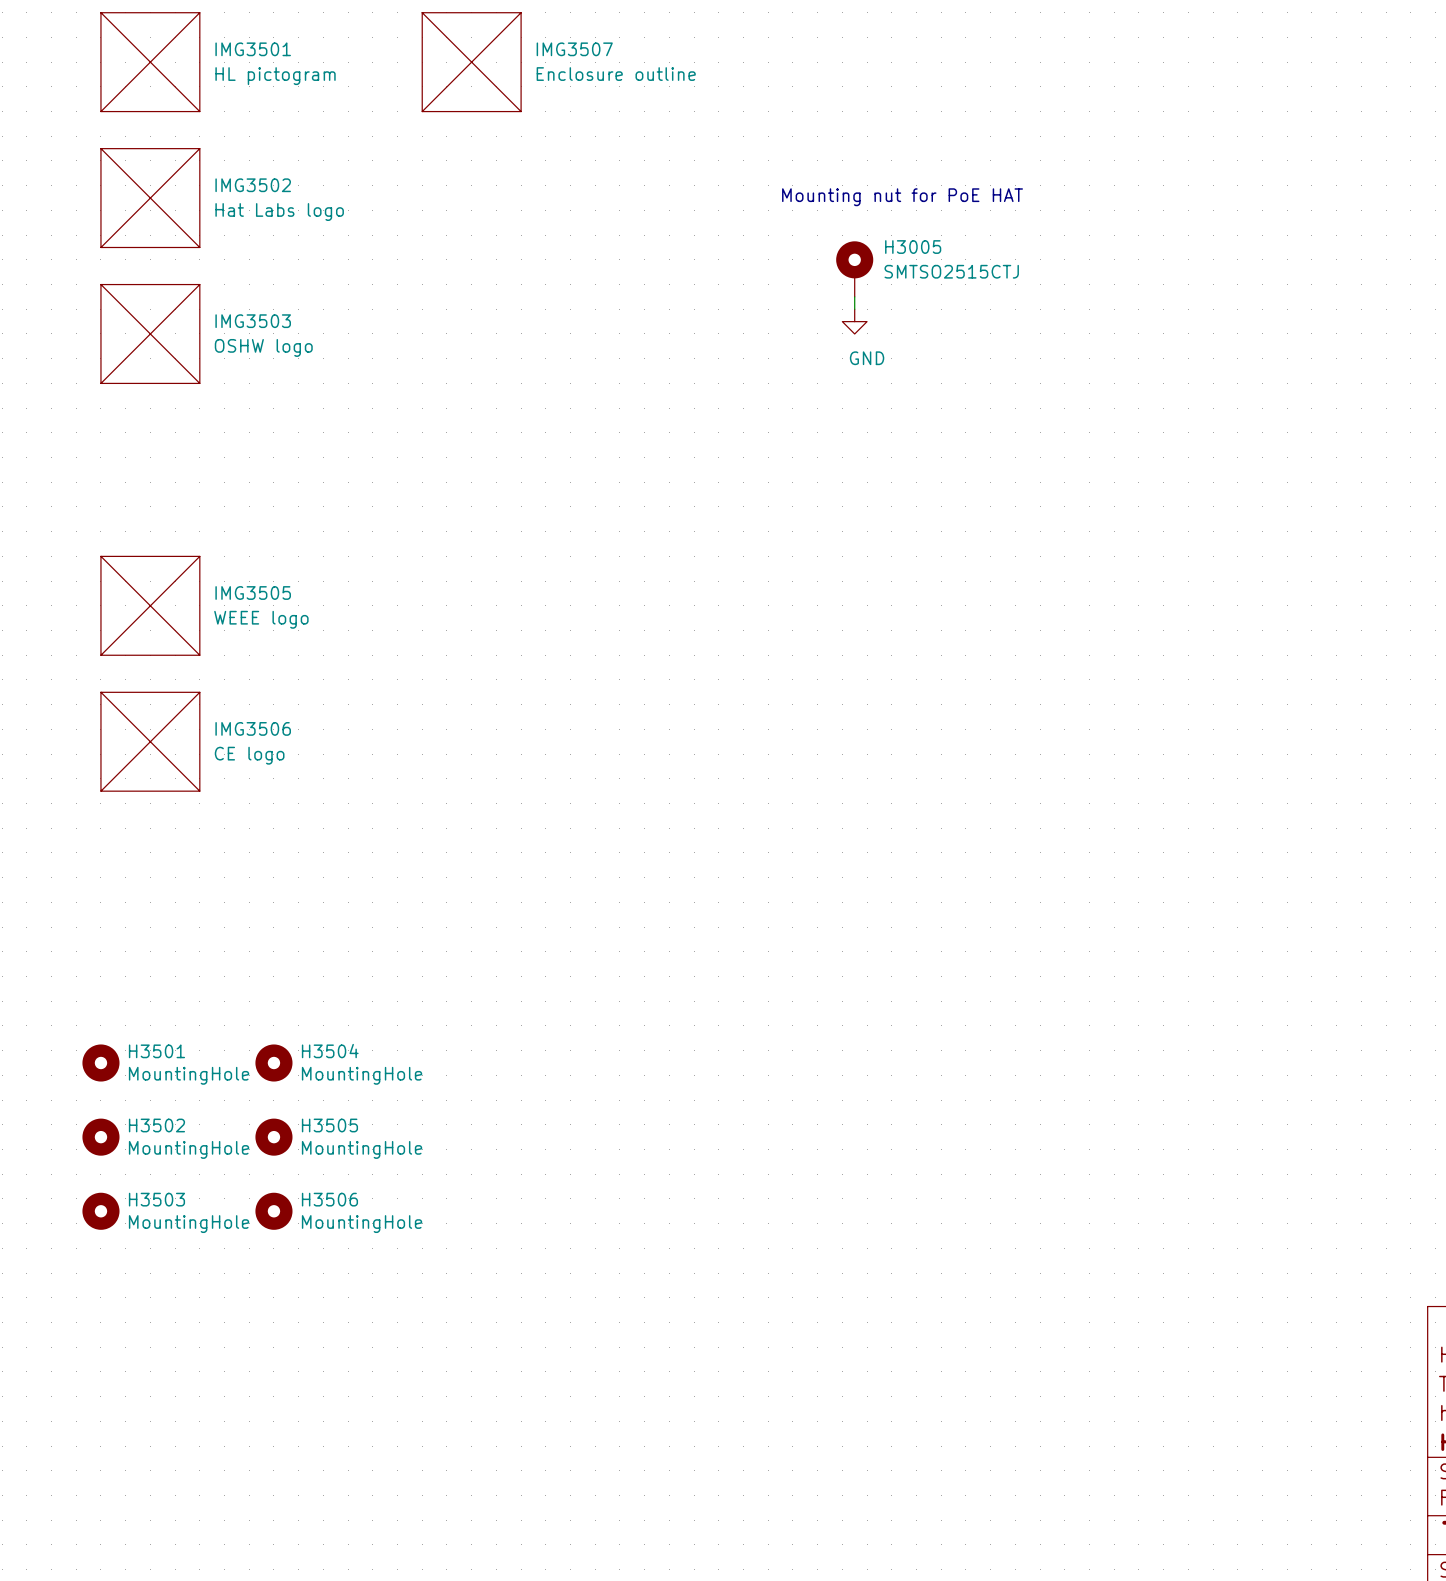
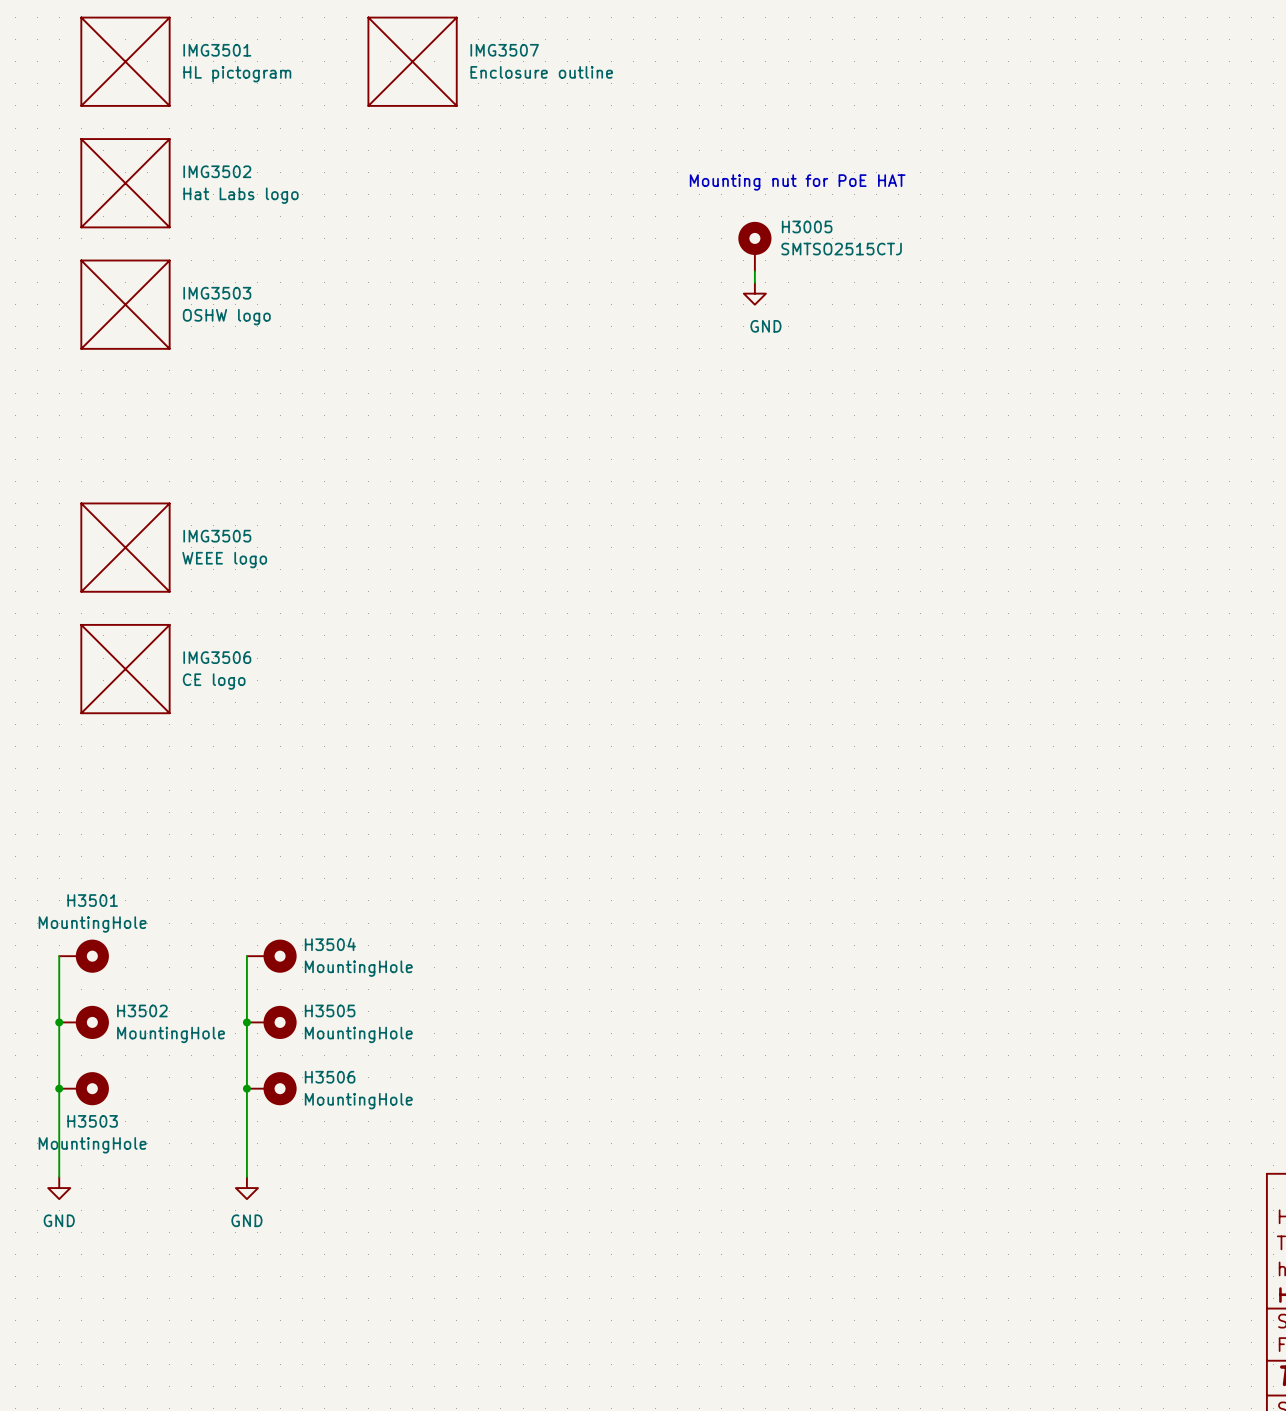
H3501 symbol: [82, 1044, 120, 1082] -> [59, 939, 109, 973]
H3504 symbol: [255, 1044, 293, 1082] -> [246, 939, 297, 973]
H3501 name position: H3501 (156, 1051) -> H3501 (92, 900)
wire: none -> (59, 956) (59, 1177)
wire: none -> (246, 956) (246, 1177)
H3501 value position: MountingHole (189, 1075) -> MountingHole (92, 924)
H3502 symbol: [82, 1118, 120, 1156] -> [59, 1005, 109, 1039]
H3505 symbol: [255, 1118, 293, 1156] -> [246, 1005, 297, 1039]
junction: none -> (59, 1022)
junction: none -> (246, 1022)
H3503 symbol: [82, 1192, 120, 1230] -> [59, 1072, 109, 1106]
H3506 symbol: [255, 1192, 293, 1230] -> [246, 1072, 297, 1106]
H3503 name position: H3503 (156, 1199) -> H3503 (92, 1121)
junction: none -> (59, 1088)
junction: none -> (246, 1088)
H3503 value position: MountingHole (189, 1224) -> MountingHole (92, 1145)
power symbol: none -> GND (59, 1188)
power symbol: none -> GND (246, 1188)

